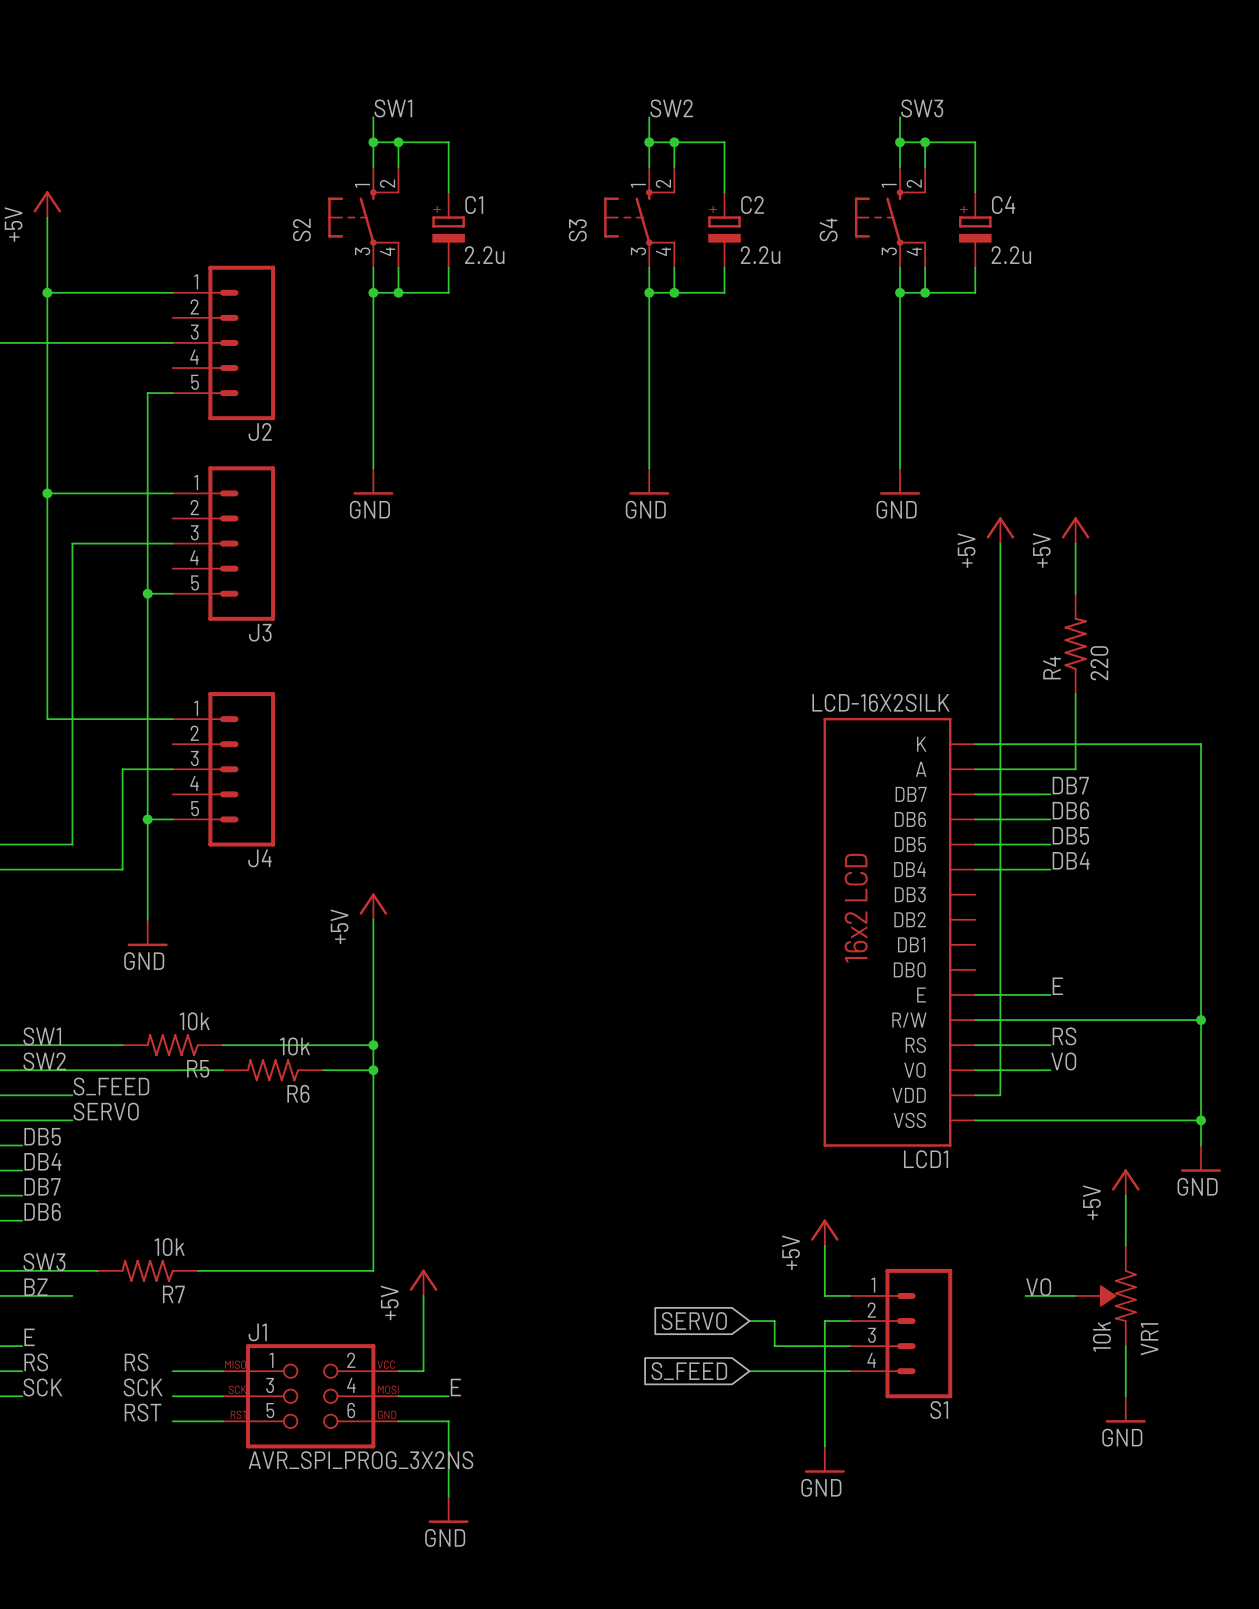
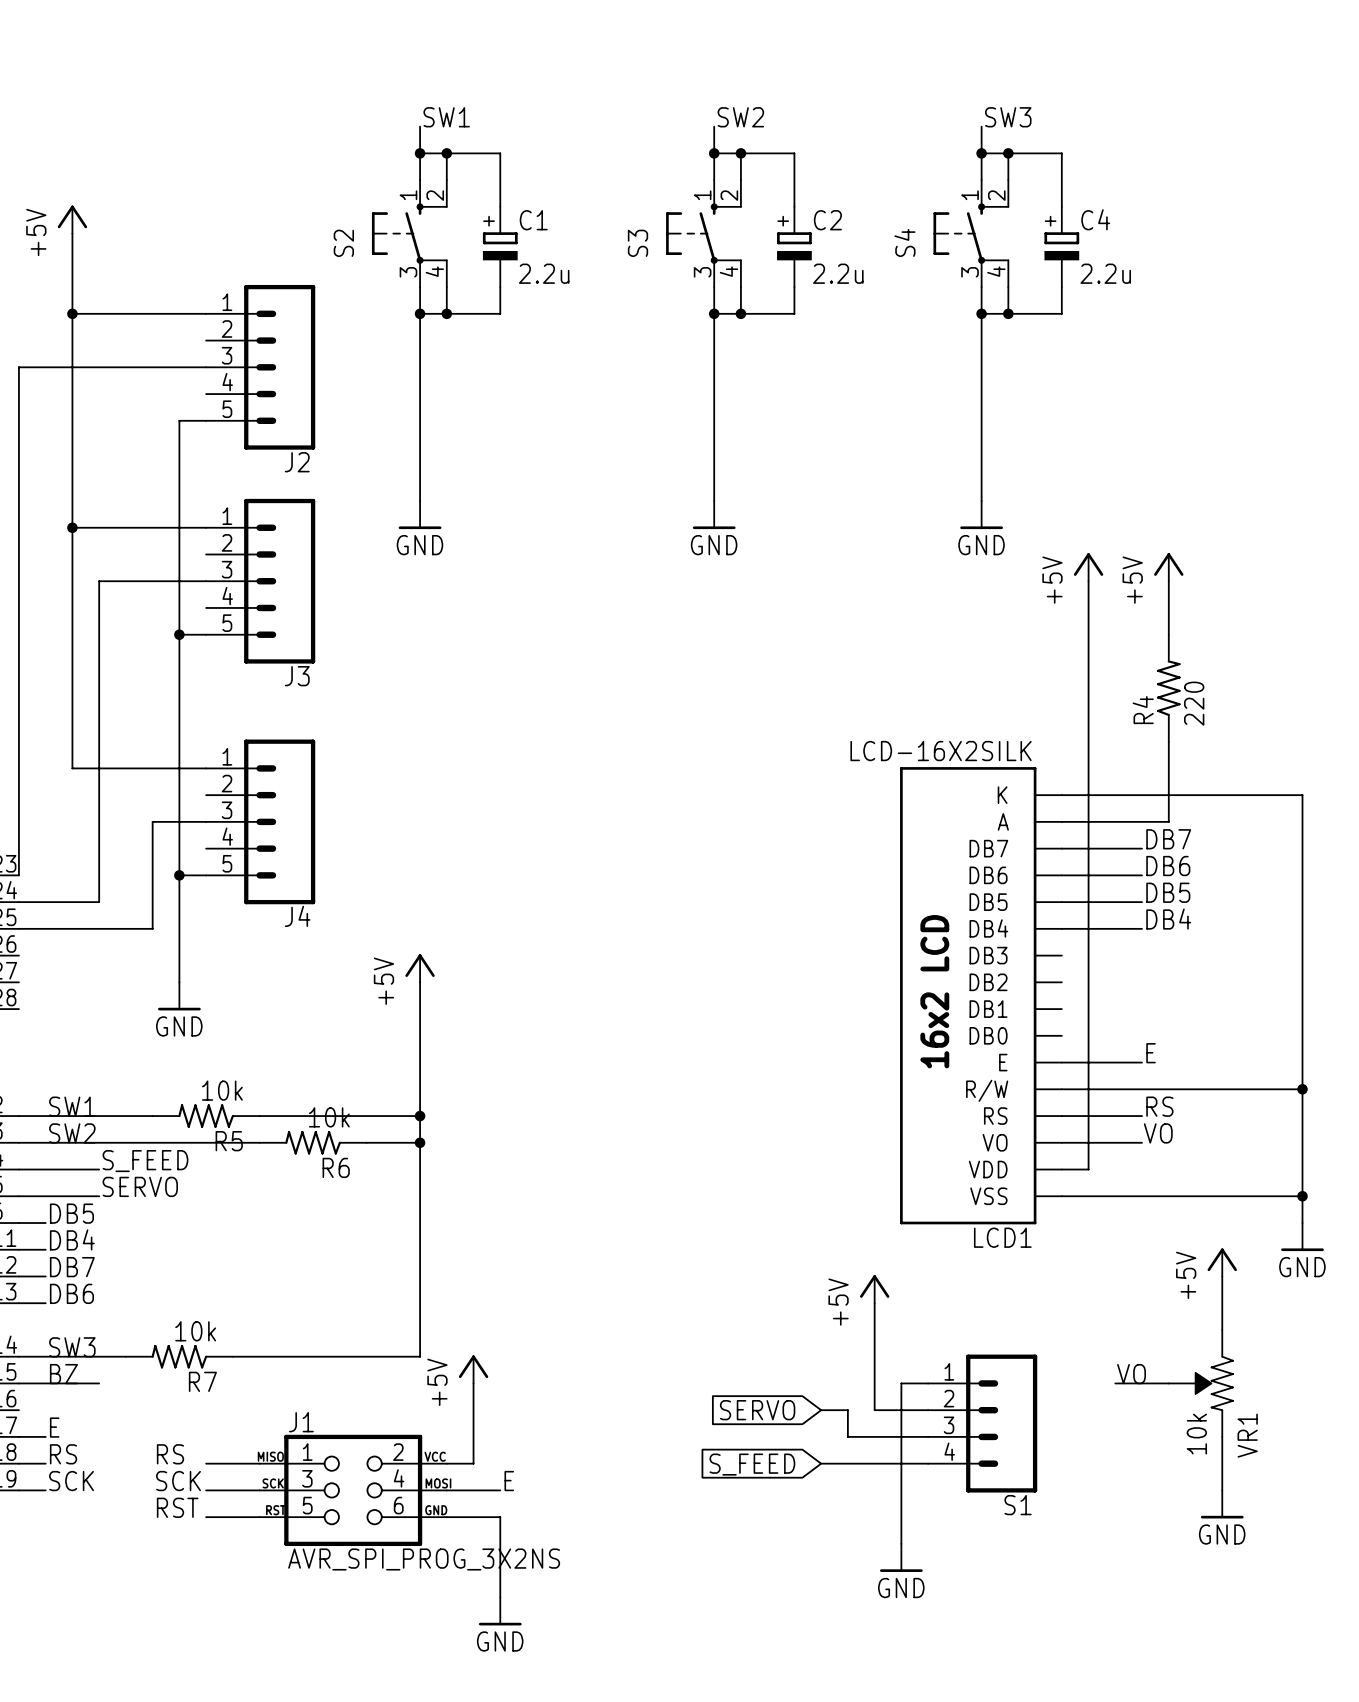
power symbol position: +5V (824, 1232) -> +5V (874, 1289)
wire: (824, 1245) (824, 1295) -> (874, 1303) (874, 1410) (901, 1410) (901, 1383)

